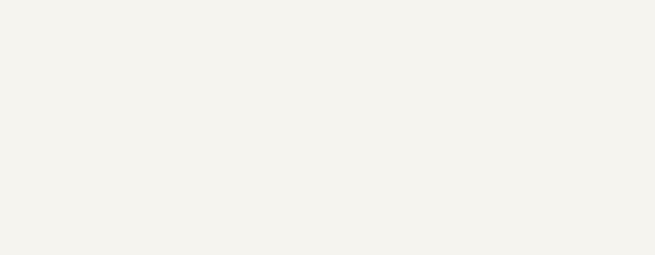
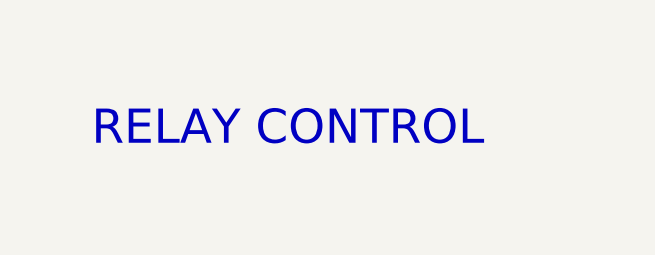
text: none -> RELAY CONTROL (290, 125)

